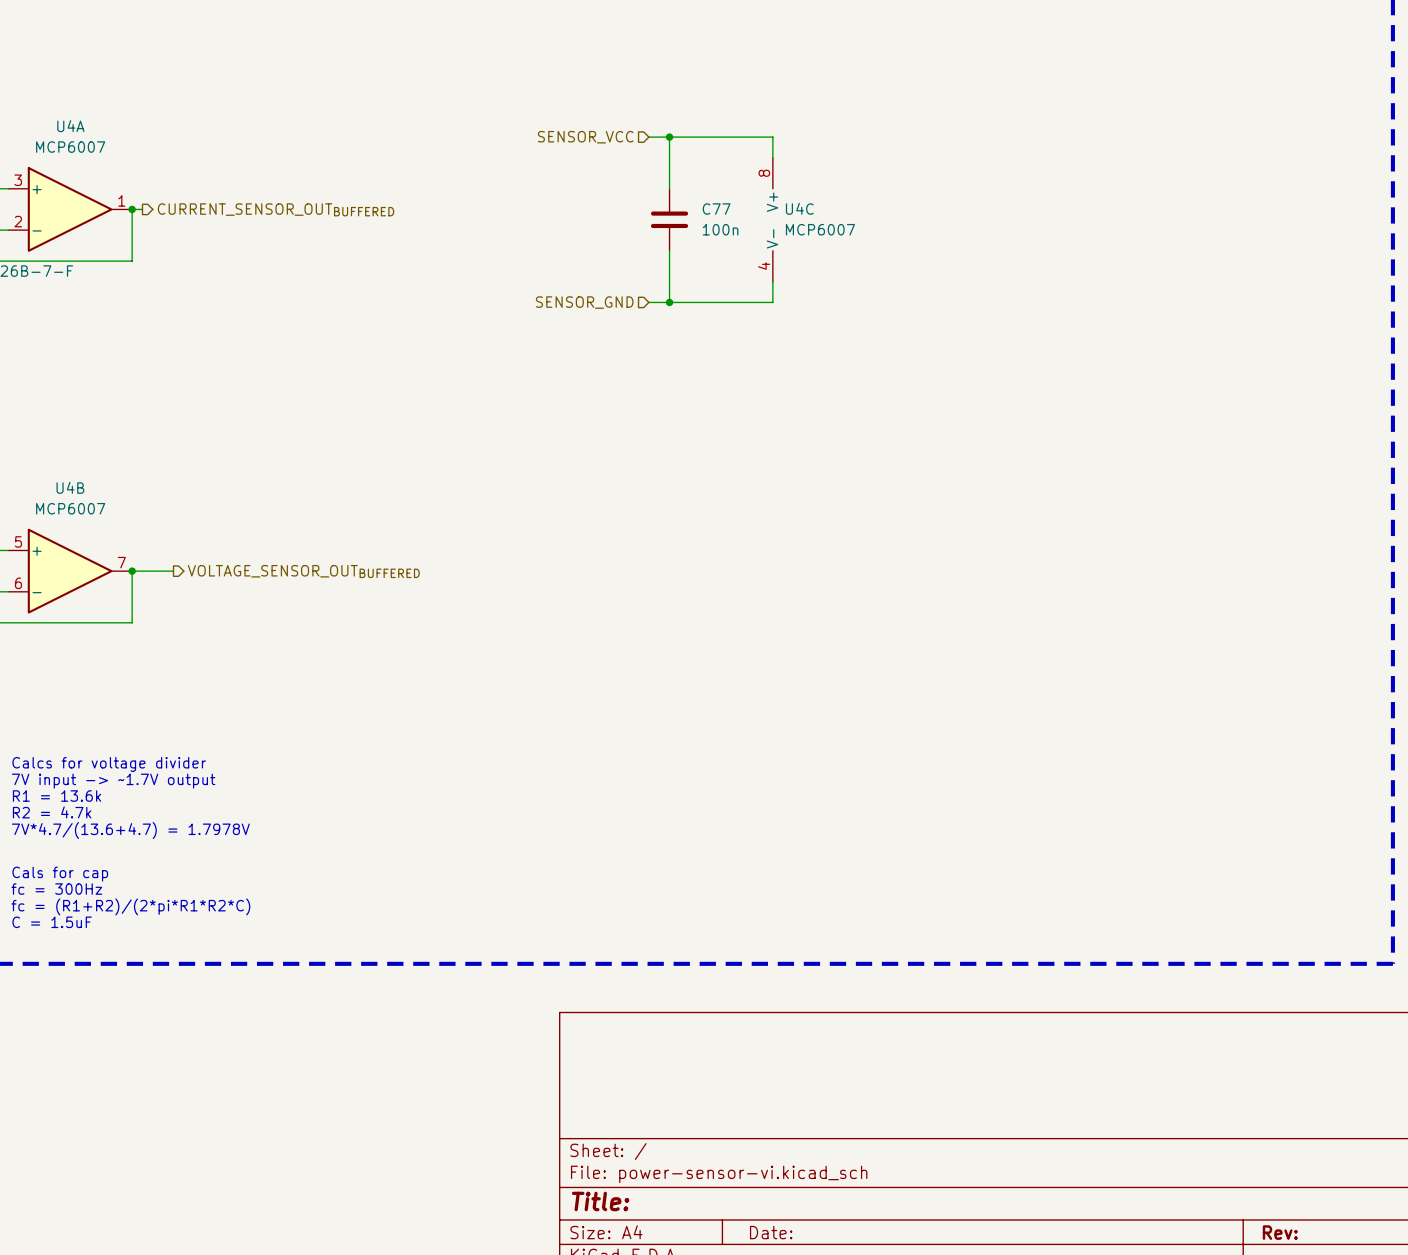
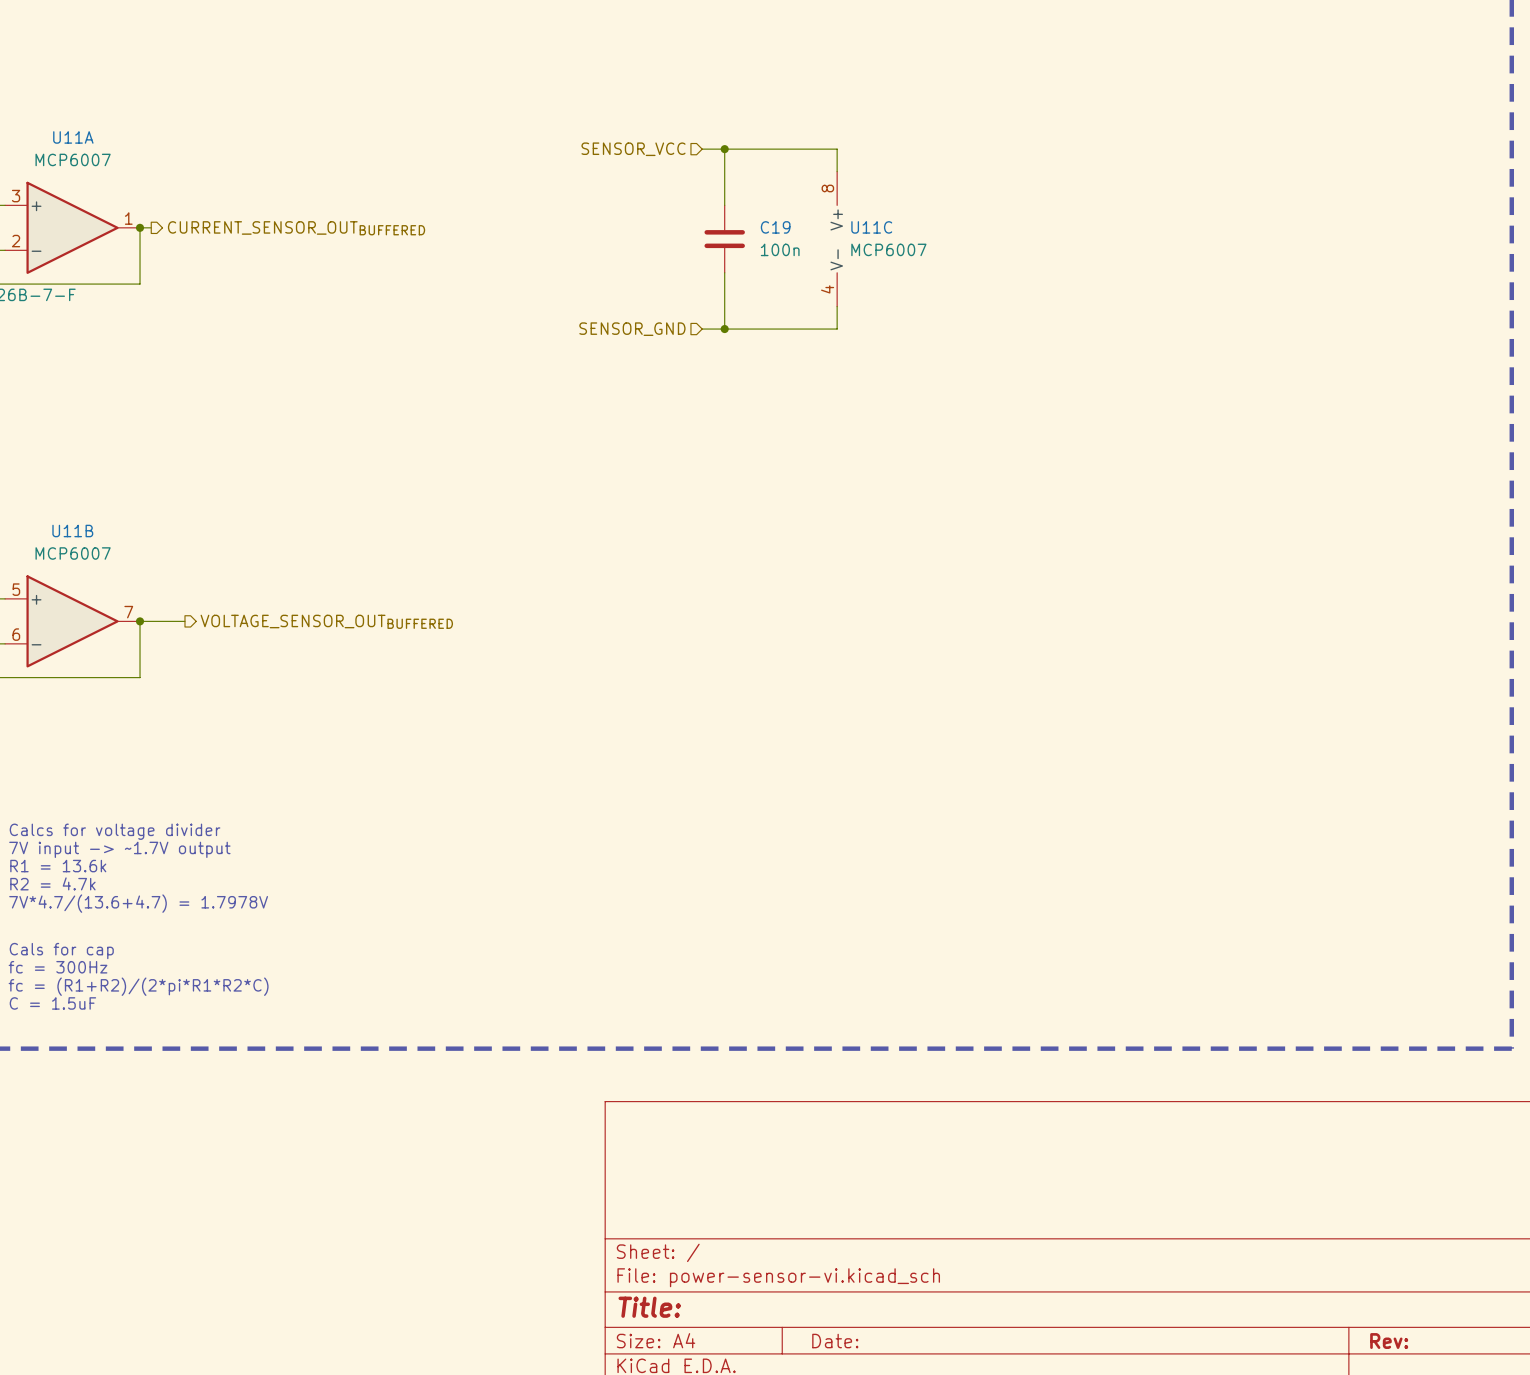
U4A name: U4A (70, 126) -> U11A (73, 137)
U4C name: U4C (799, 208) -> U11C (871, 227)
C77 name: C77 (716, 209) -> C19 (775, 227)
U4B name: U4B (70, 487) -> U11B (72, 531)

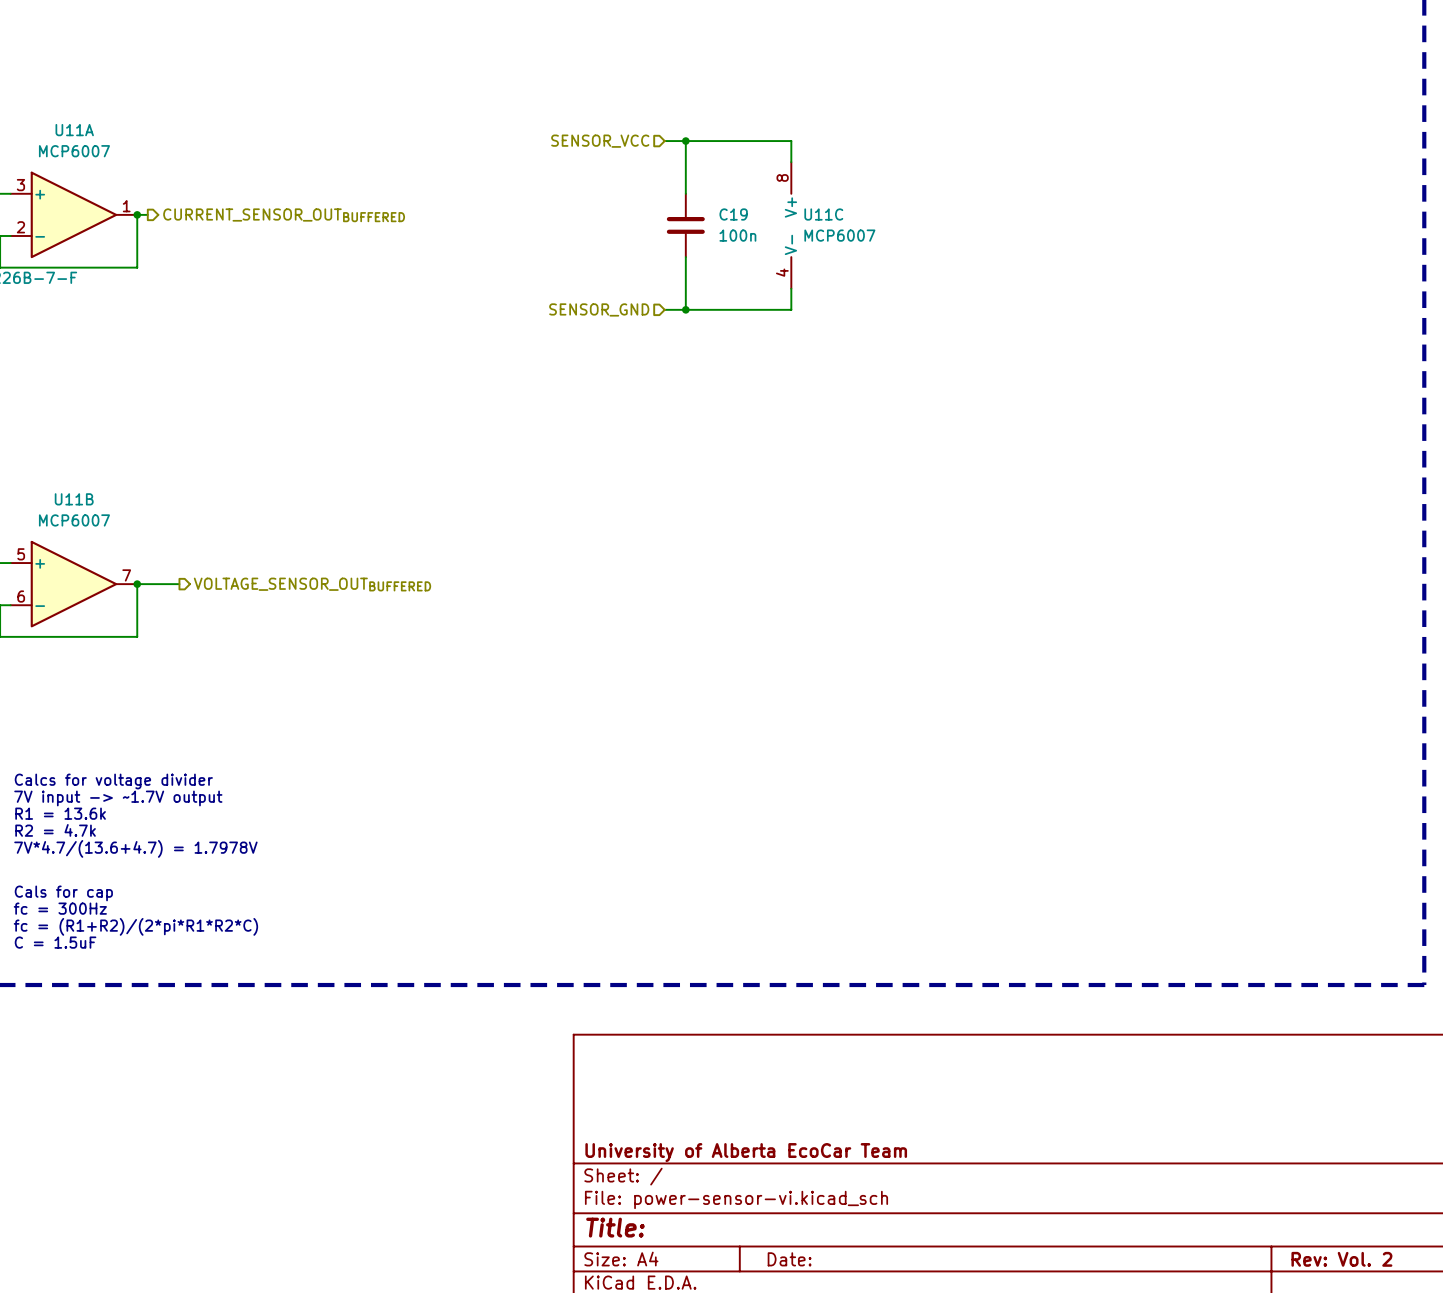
title block: none -> University of Alberta EcoCar Team (746, 1152)
title block: Rev: (1389, 1341) -> Rev: Vol. 2 (1341, 1259)

